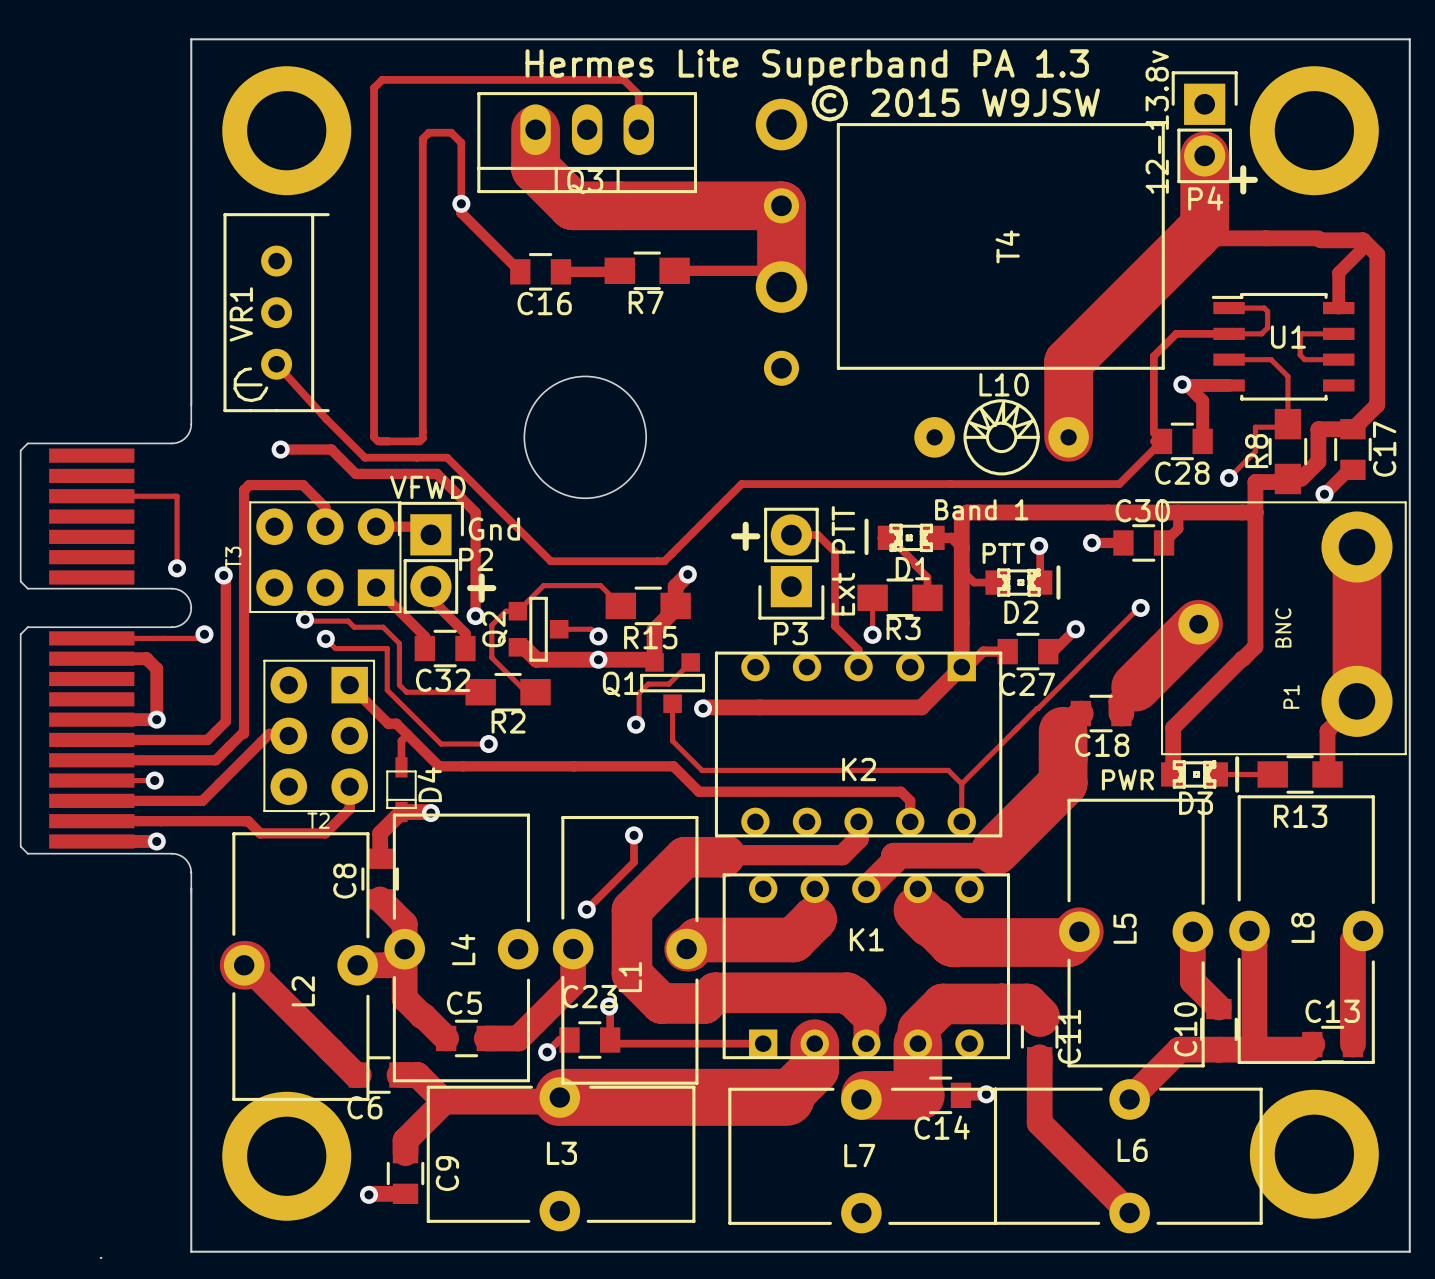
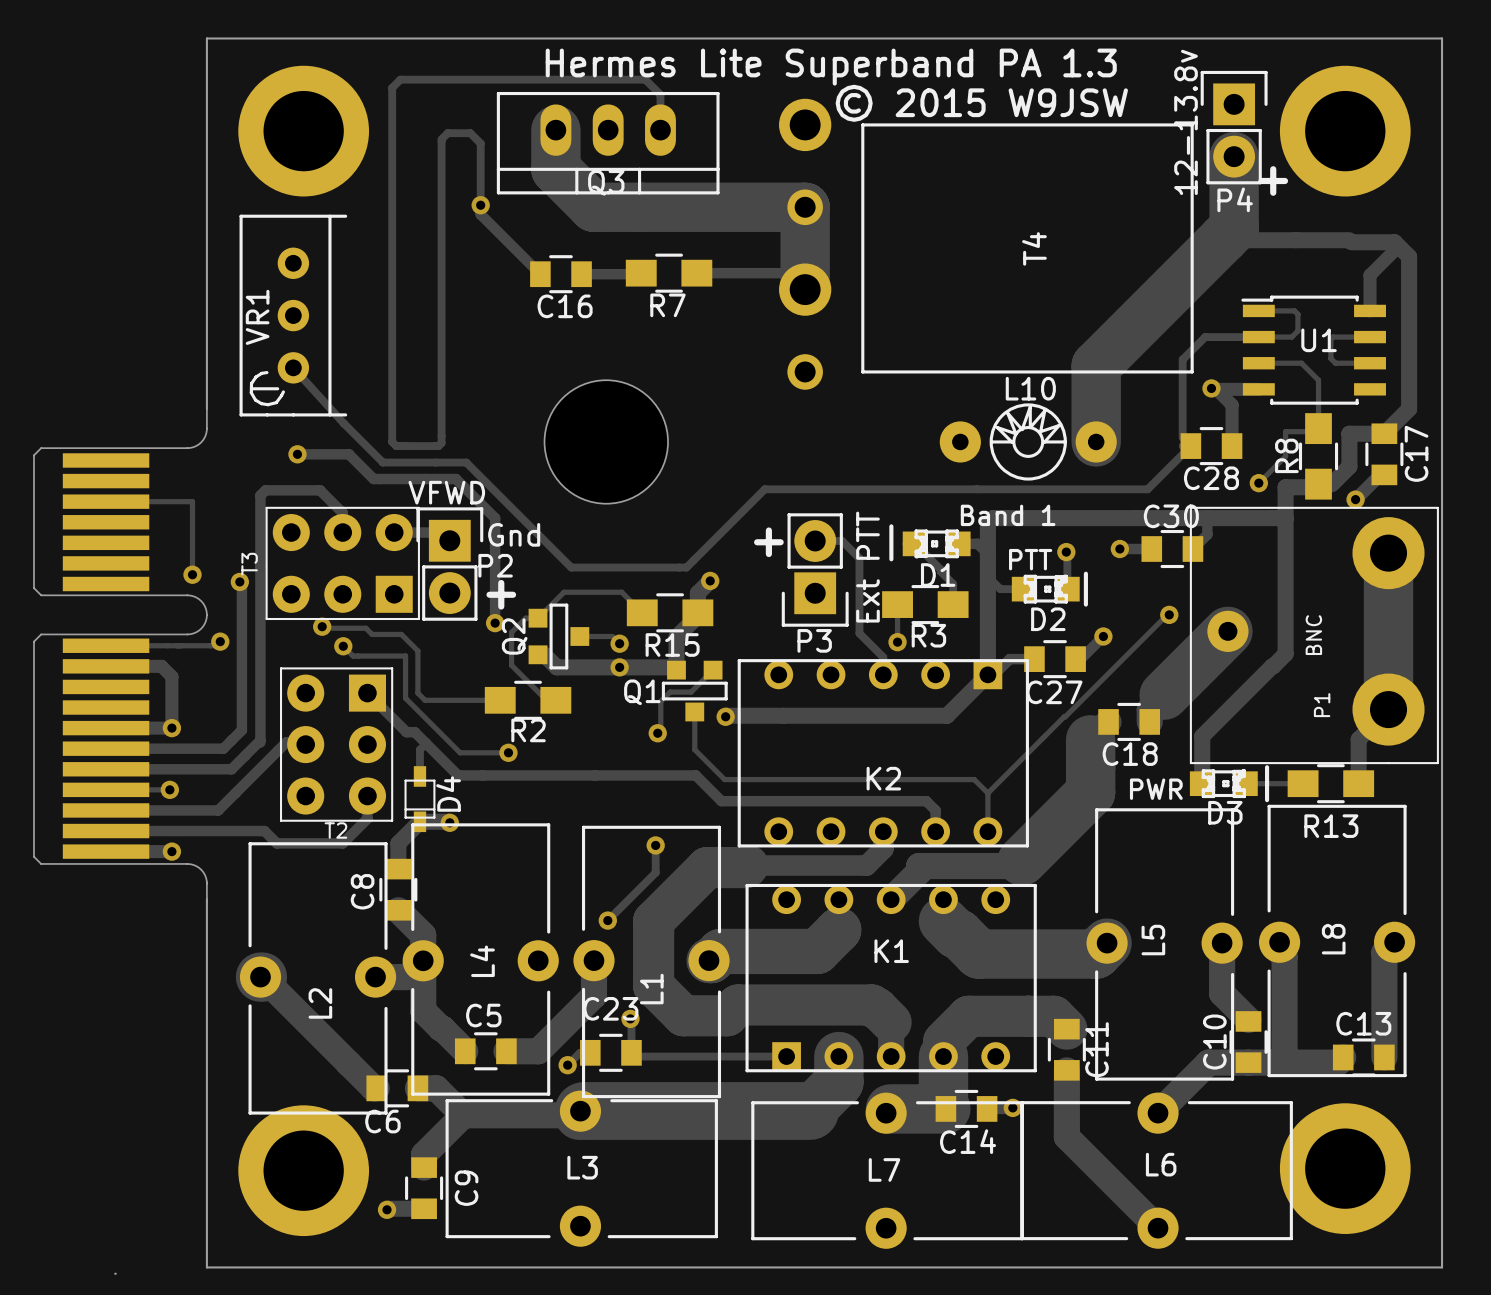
track: (377, 586) (424, 636) (424, 648) -> none
track: (430, 586) (430, 598) (465, 633) (465, 648) -> none
C32: (445, 648) -> none

